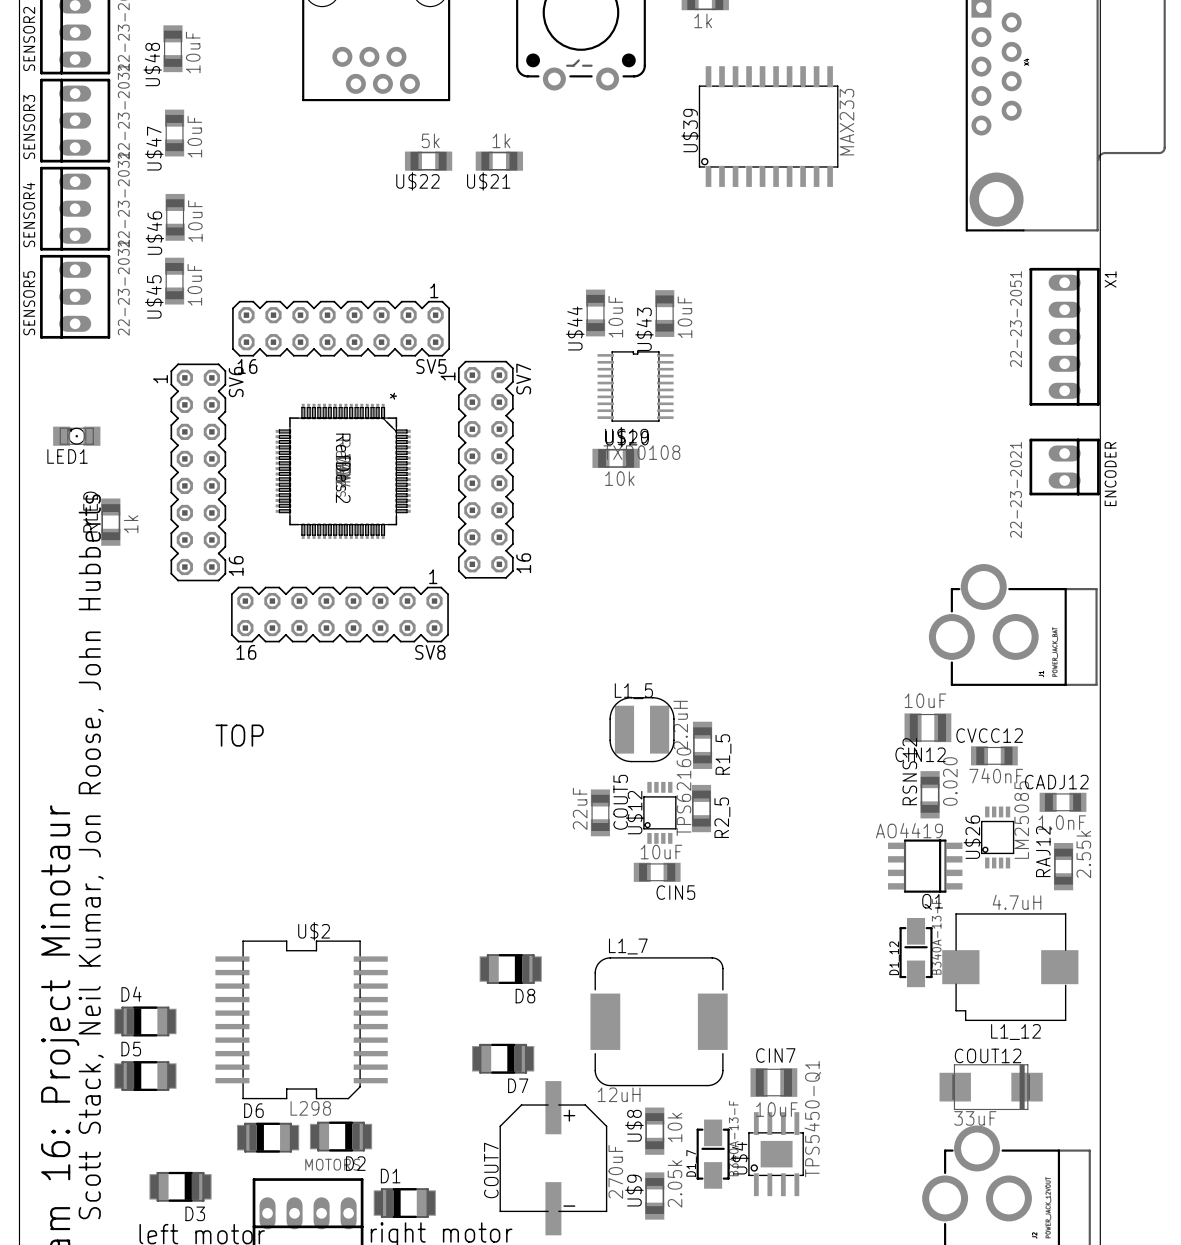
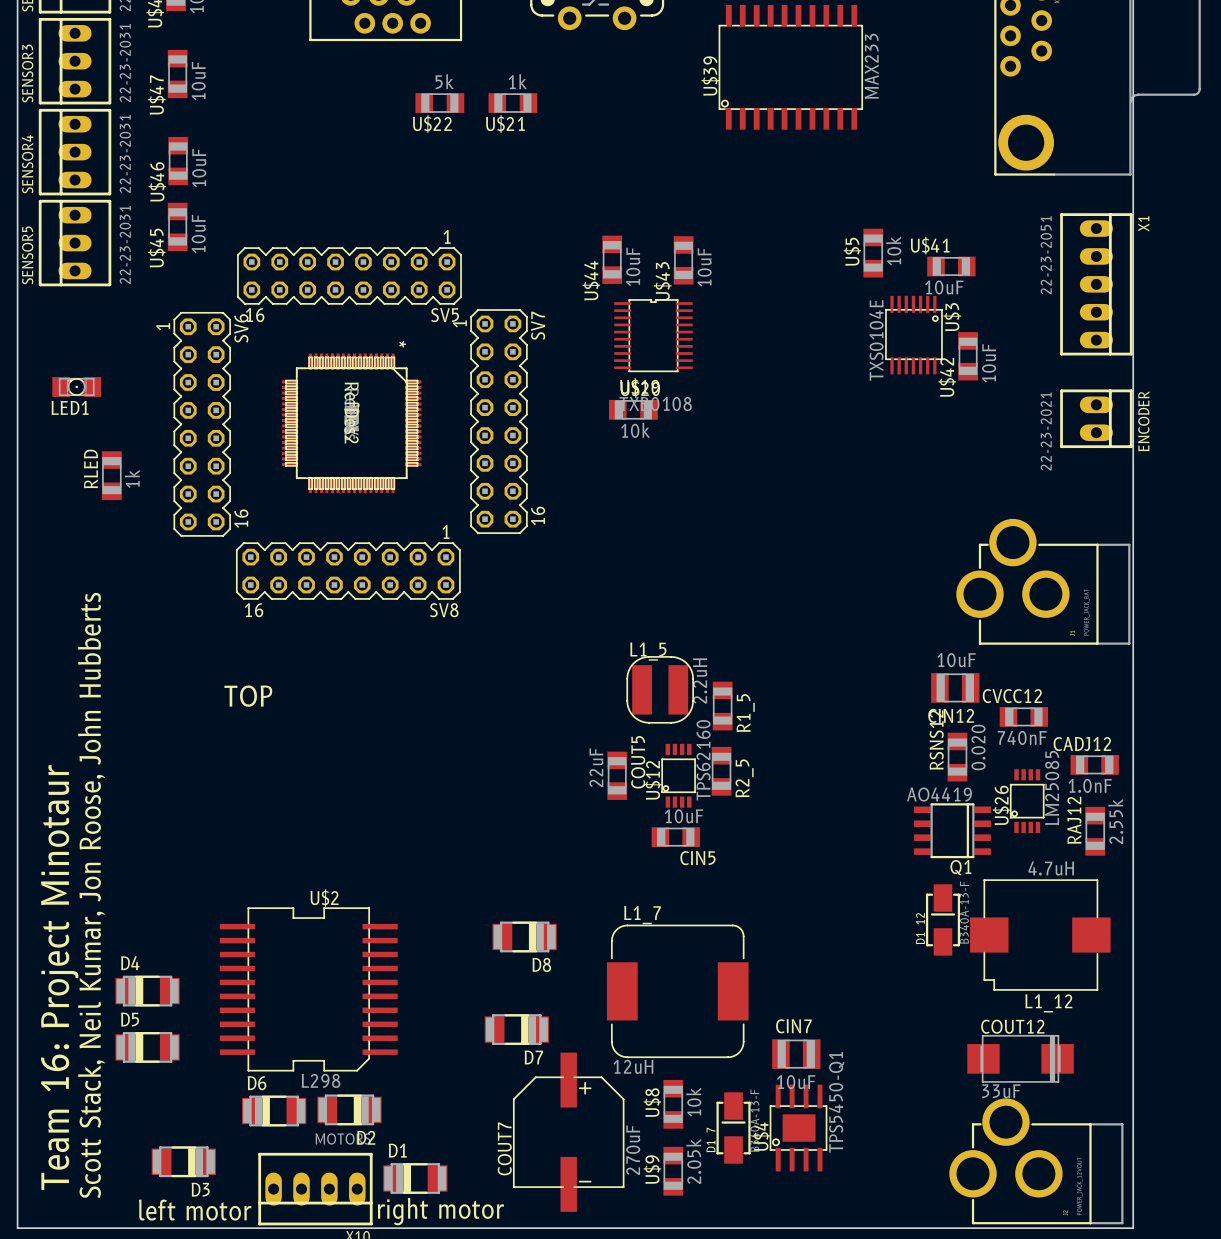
U$5: none -> 10k (873, 253)
U$41: none -> 10uF (951, 266)
U$3: none -> TXS0104E (913, 335)
U$42: none -> 10uF (968, 356)

